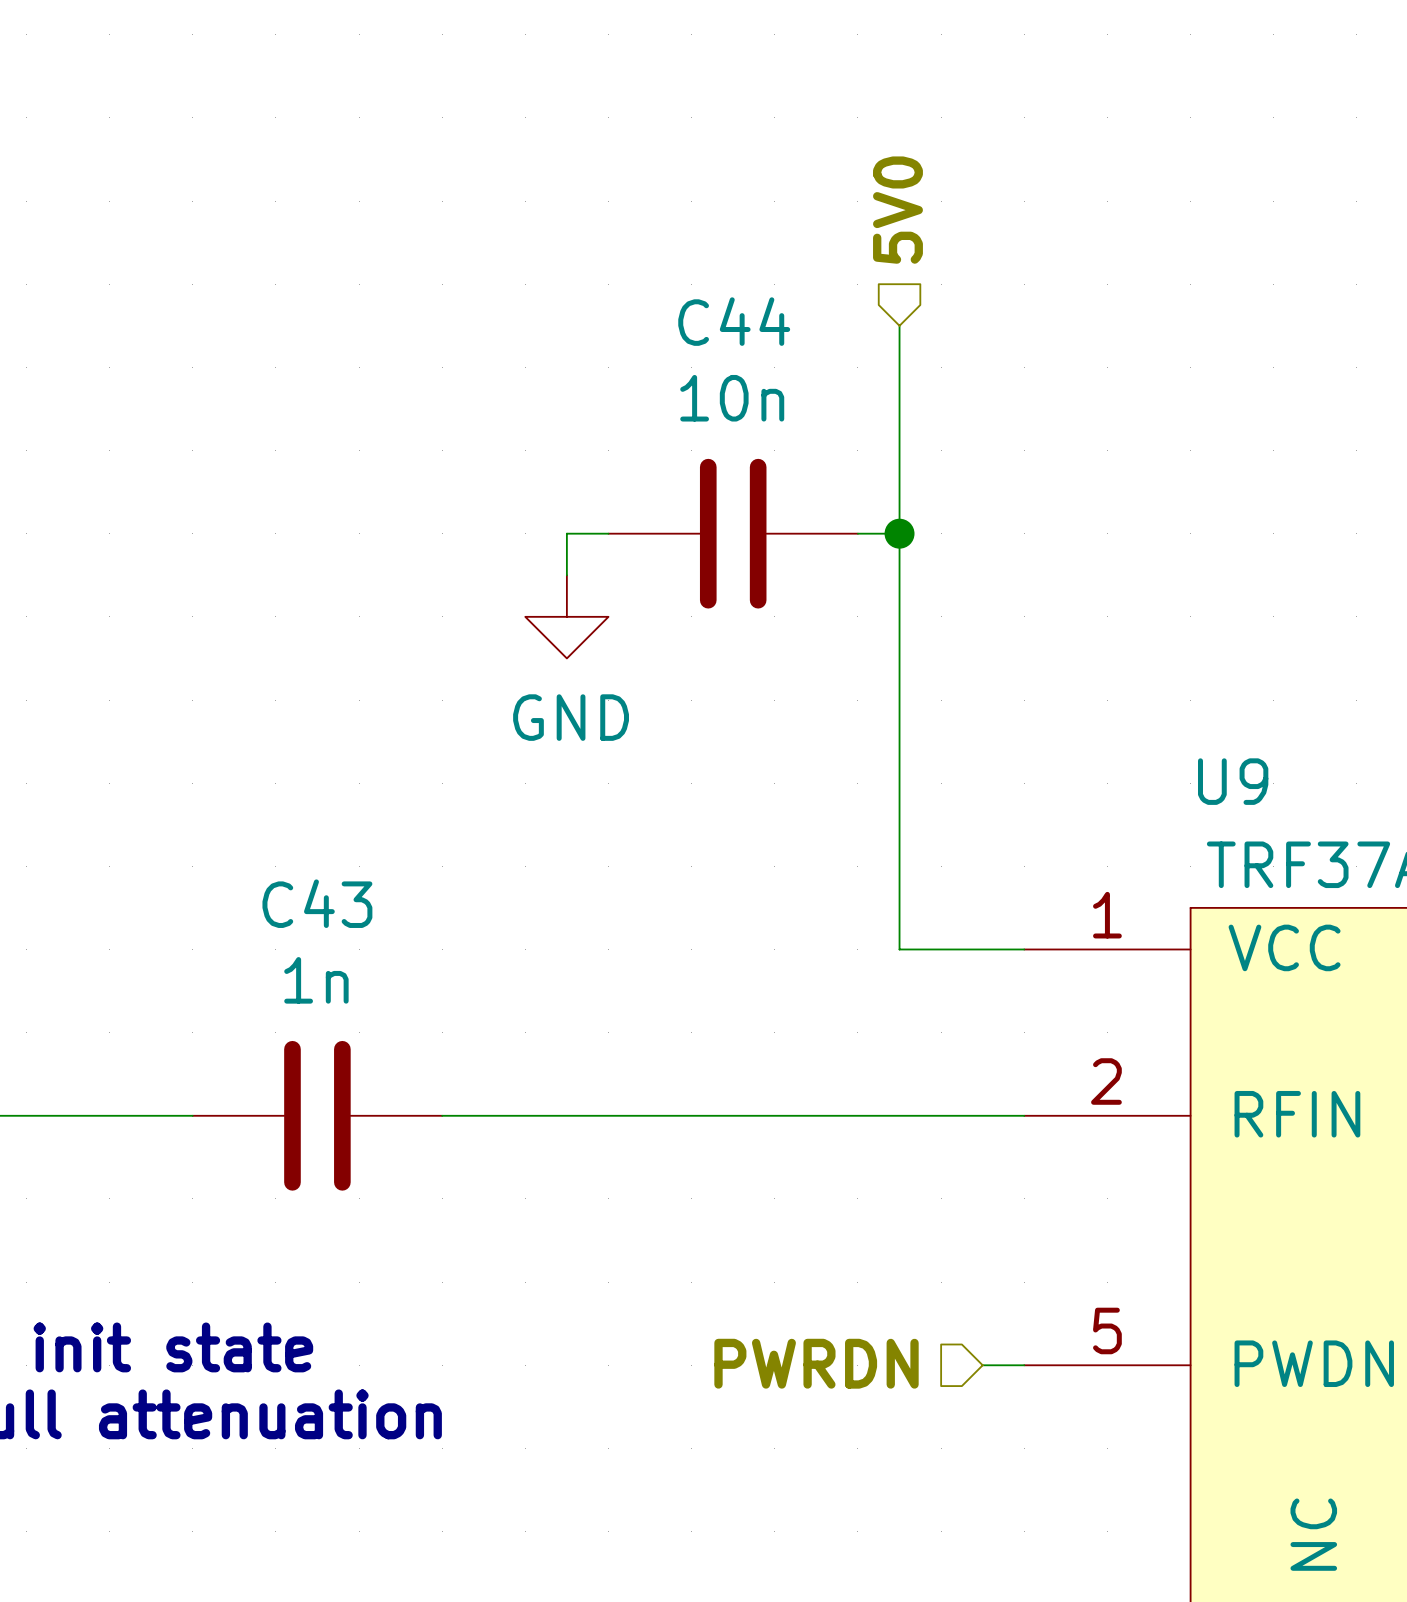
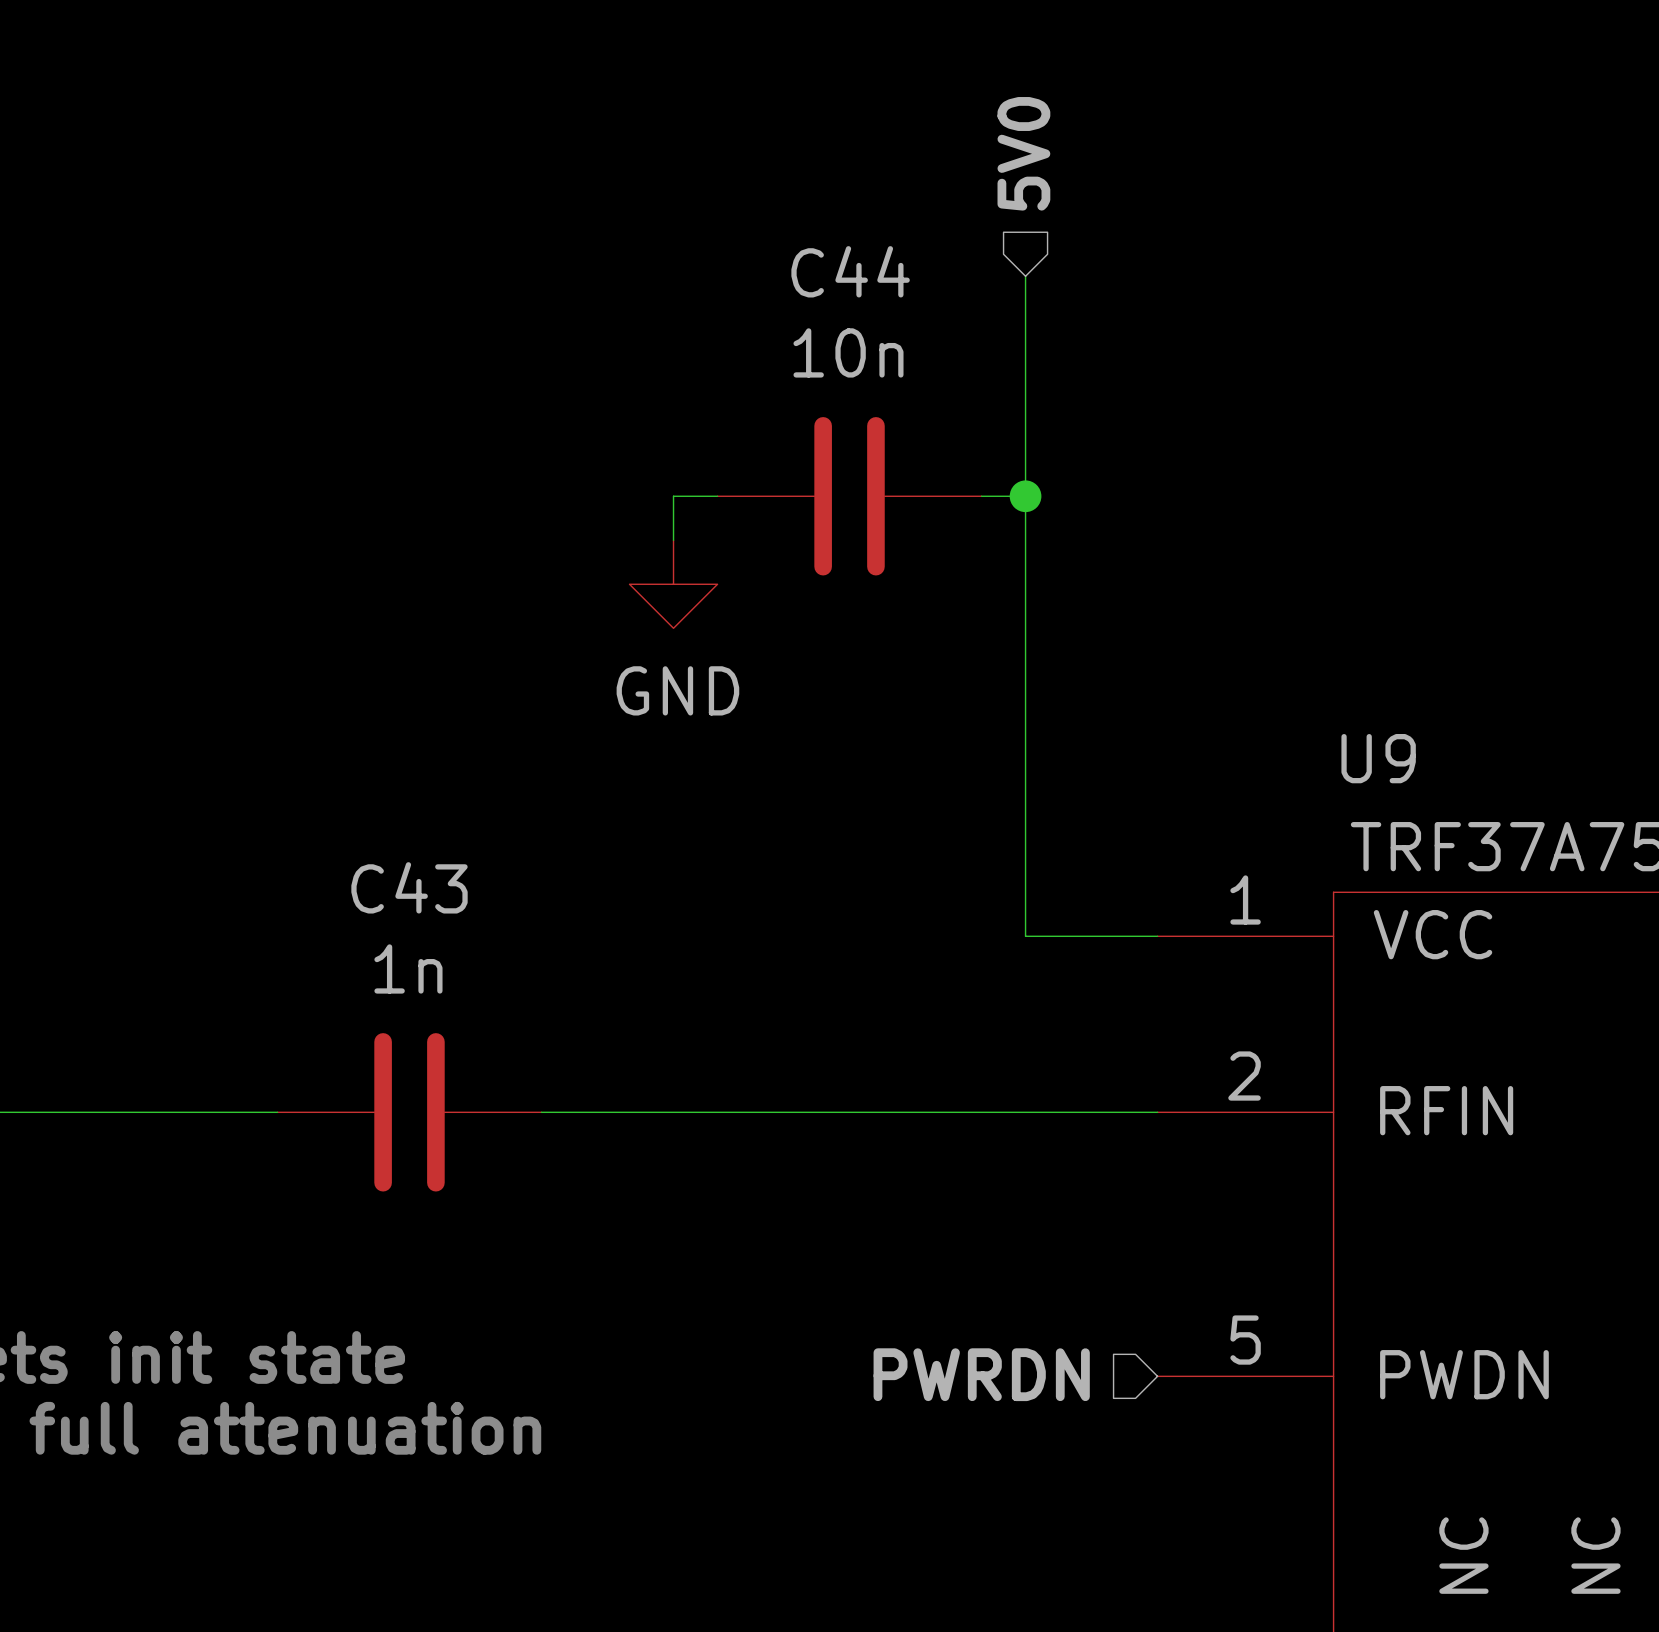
hierarchical label position: PWRDN (816, 1363) -> PWRDN (981, 1374)
wire: (982, 1365) (1024, 1365) -> none

